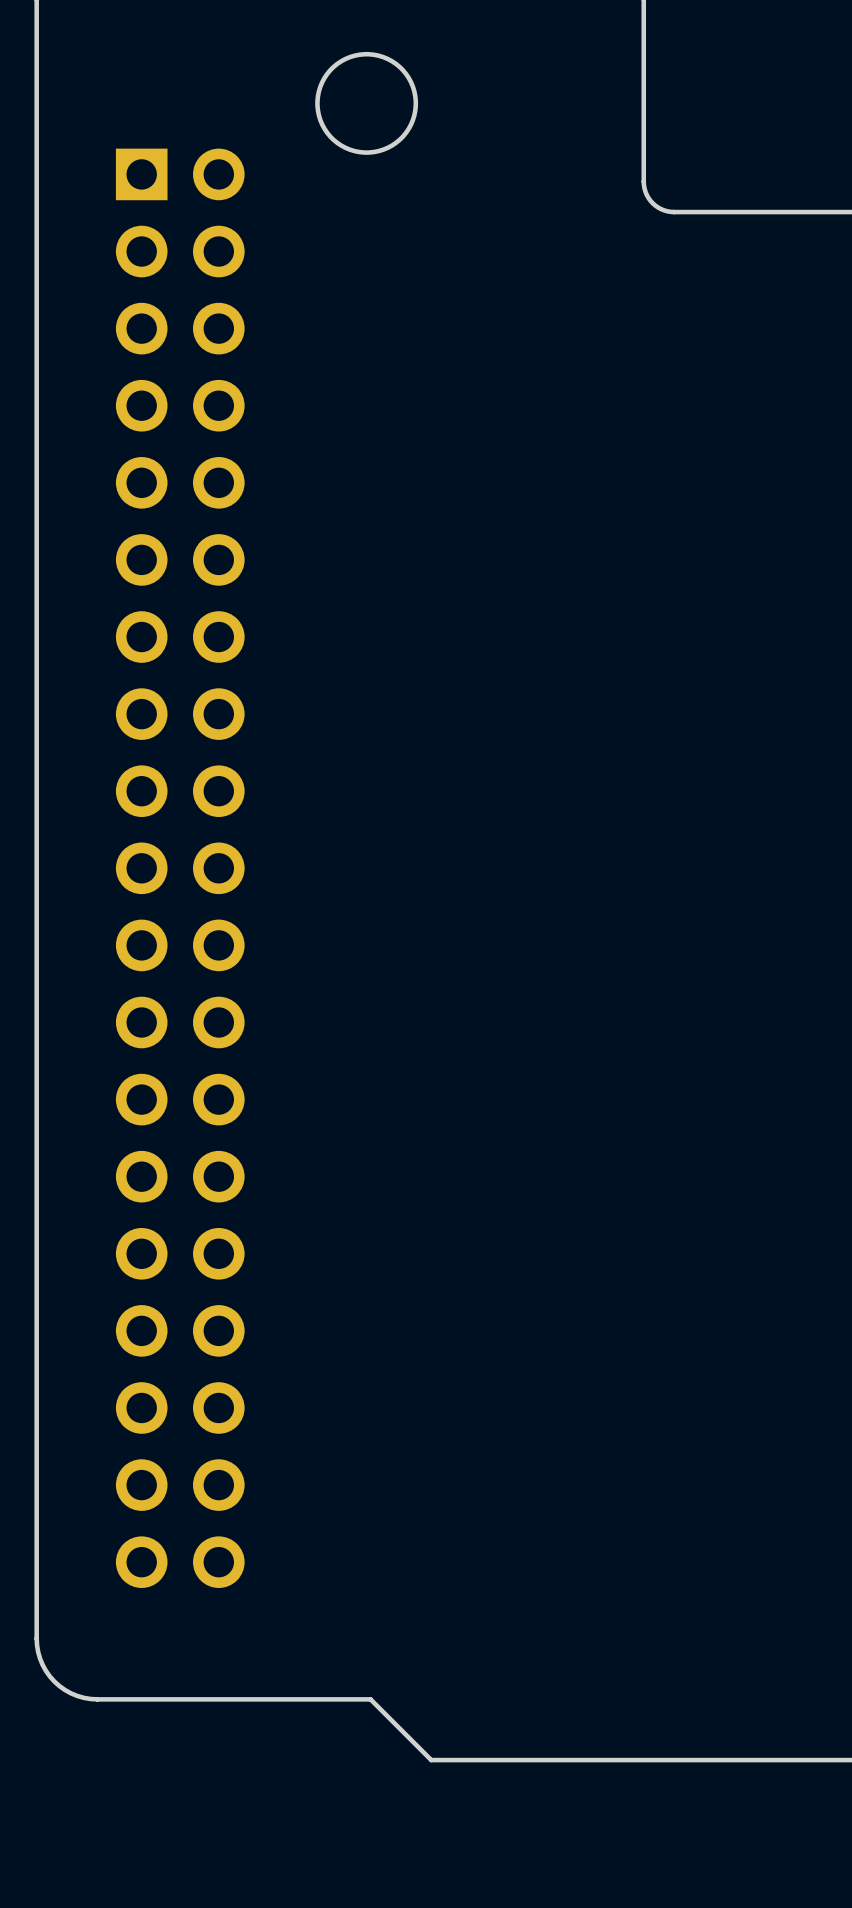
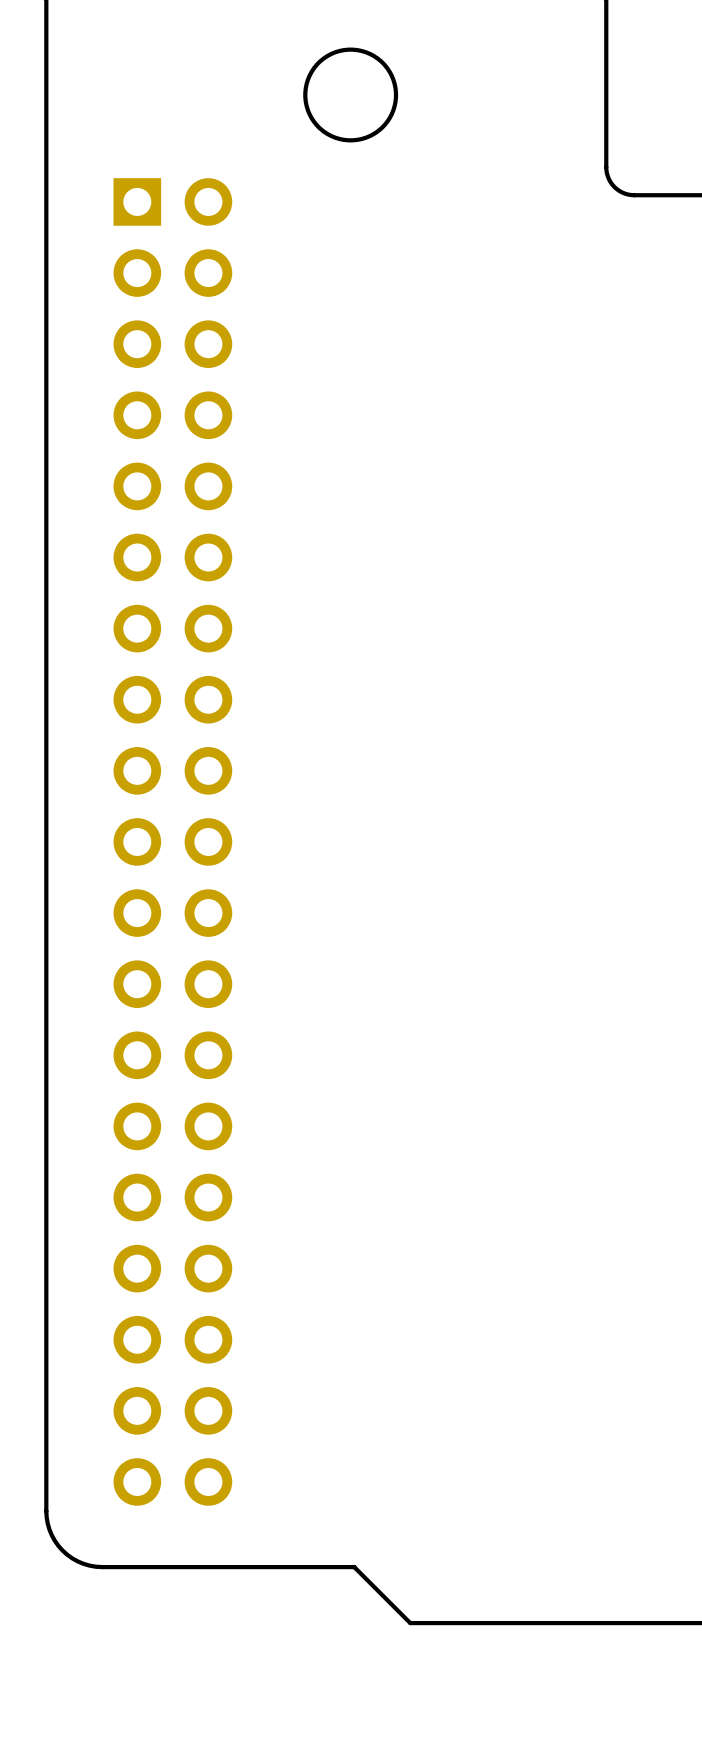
part position: (180, 868) -> (172, 841)

